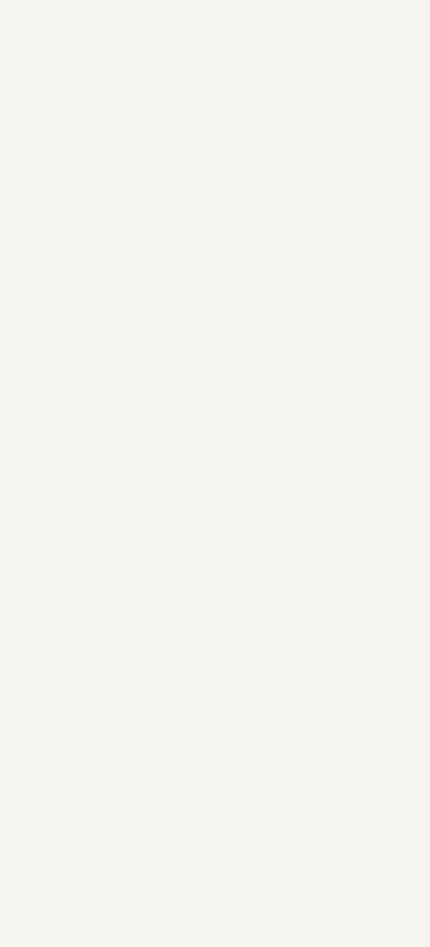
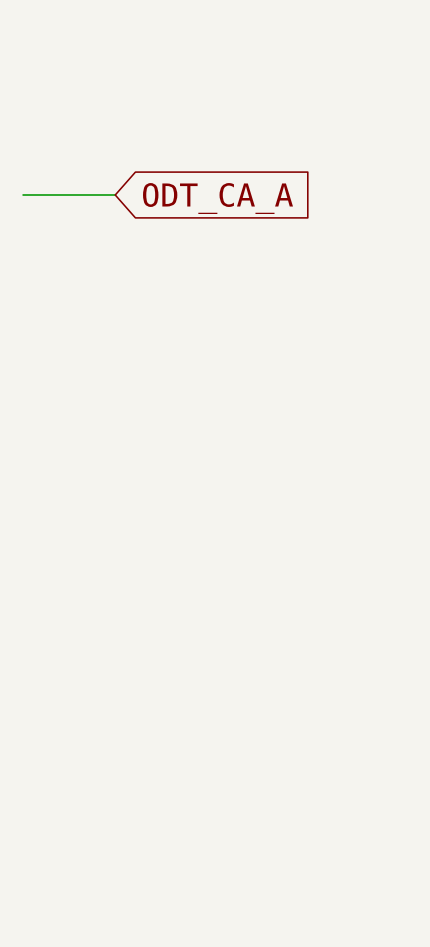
wire: none -> (23, 194) (115, 194)
global label: none -> ODT_CA_A (217, 198)

